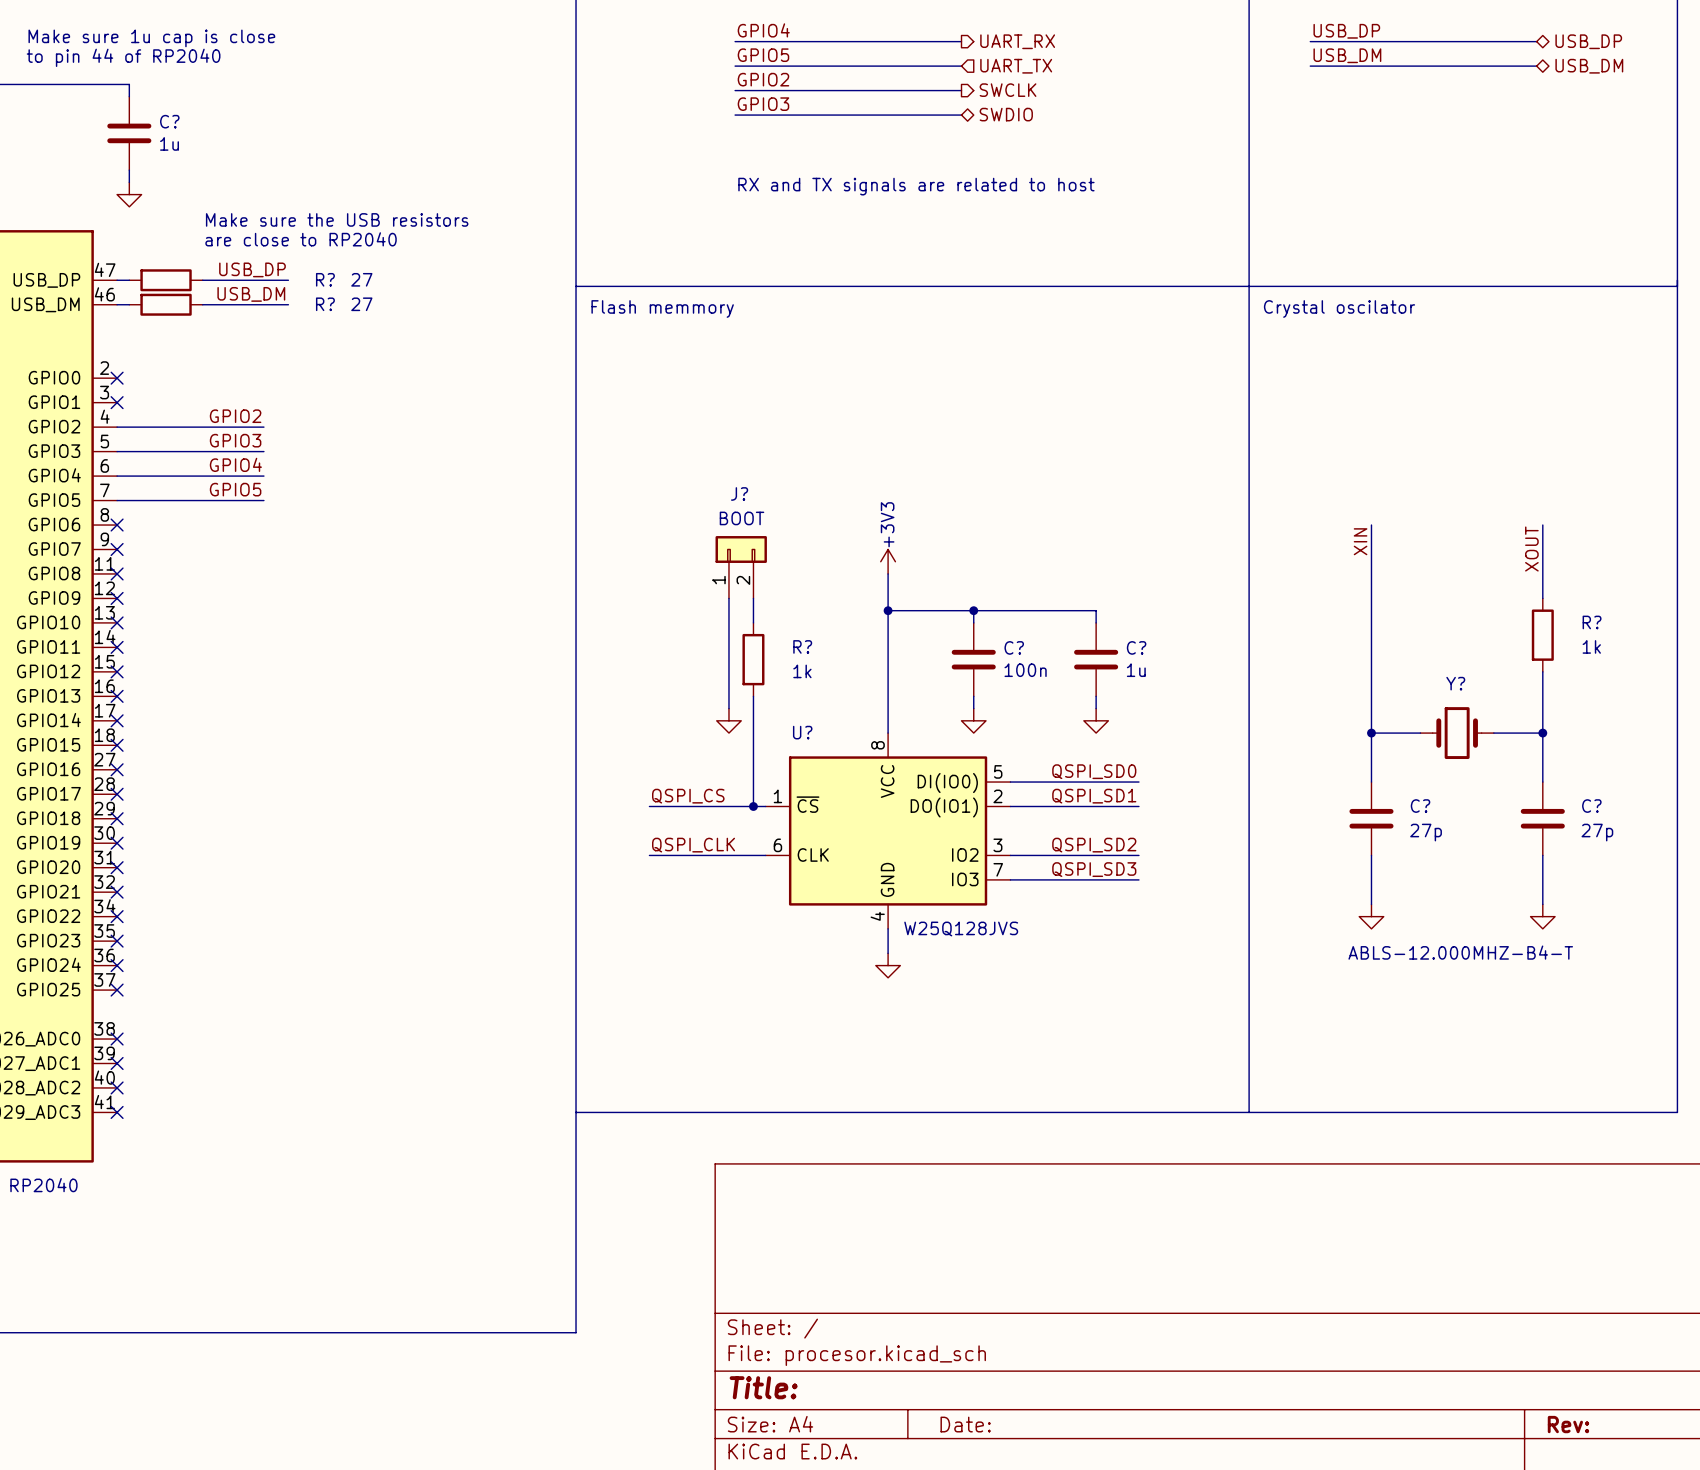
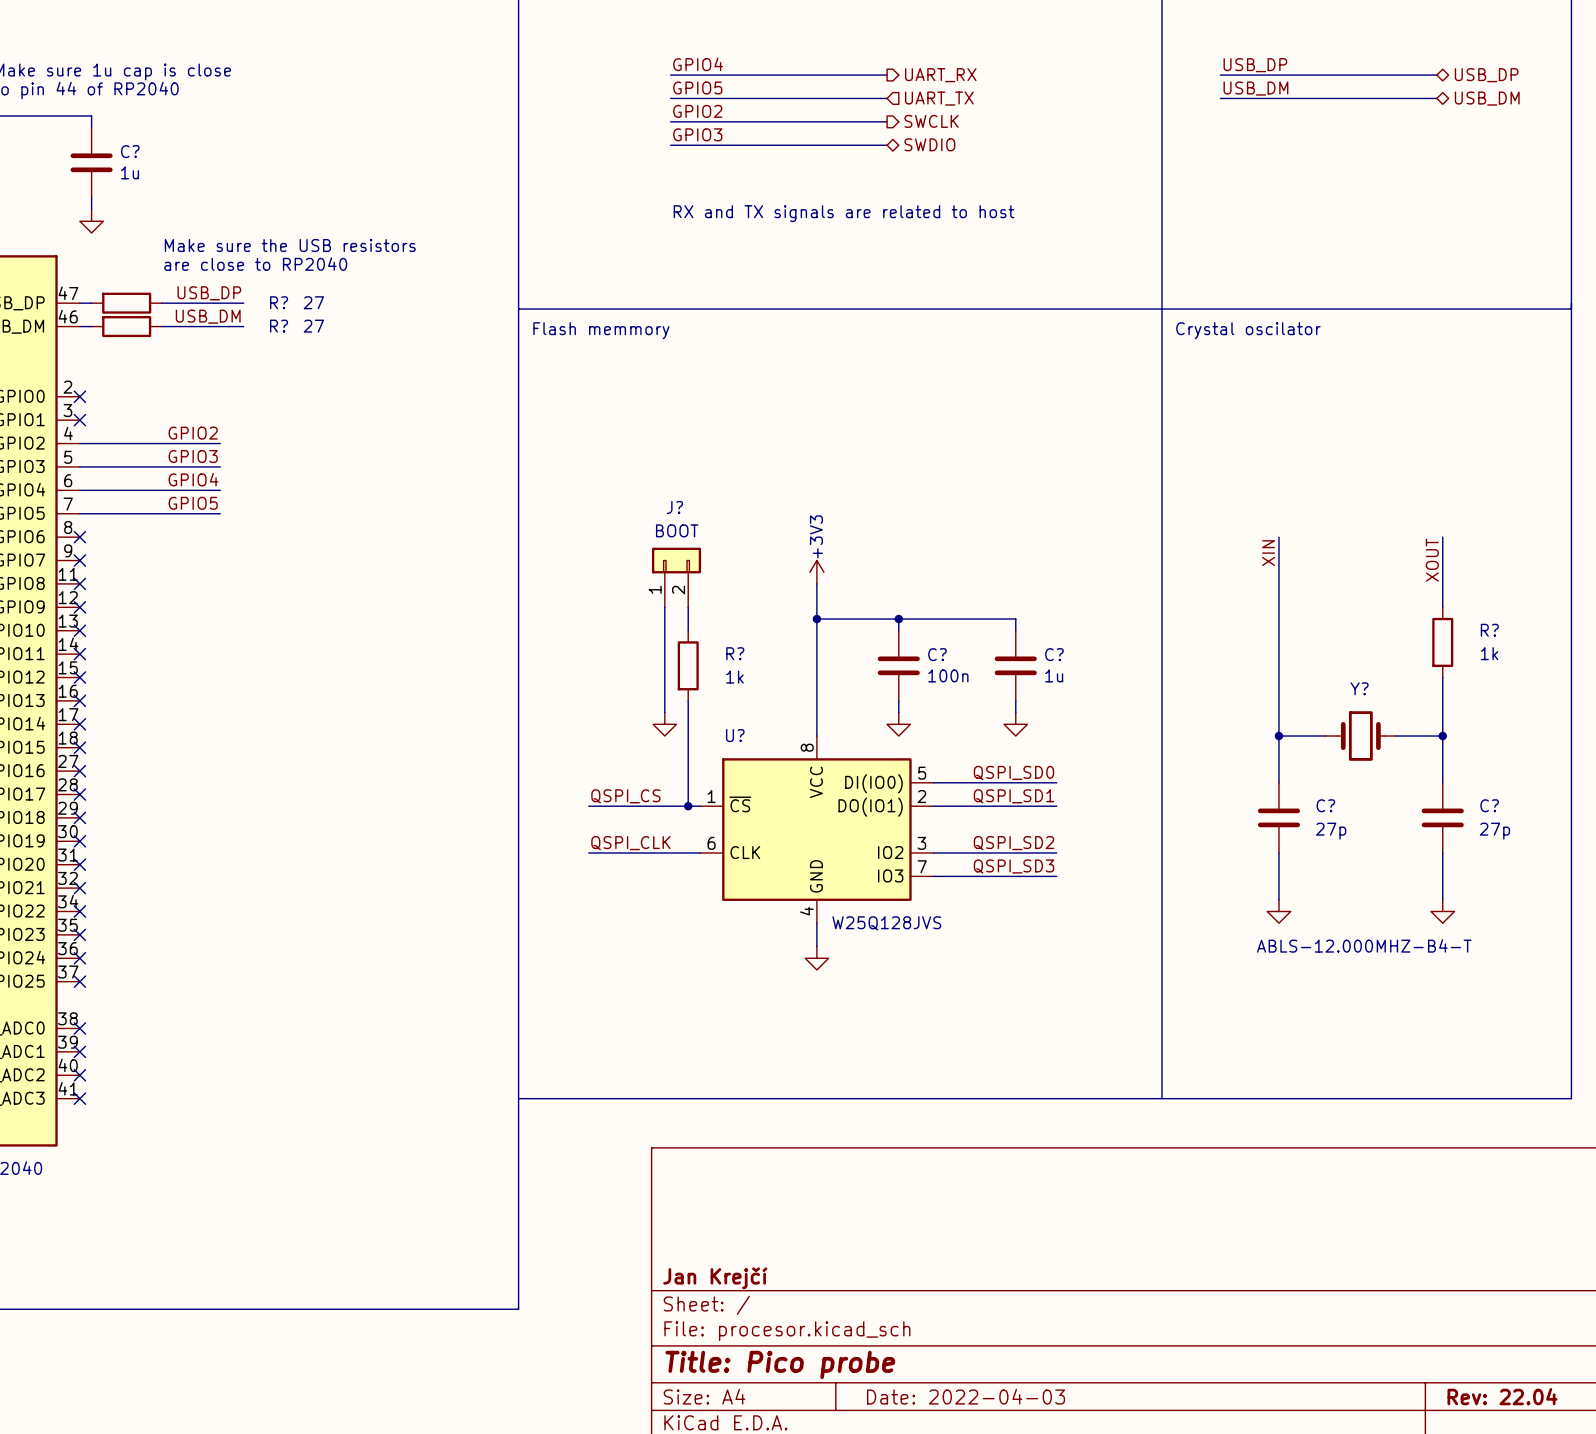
title block: none -> Jan Krejčí (715, 1278)
title block: Title: (763, 1387) -> Title: Pico probe (780, 1364)
title block: Date: (965, 1424) -> Date: 2022-04-03 (966, 1396)
title block: Rev: (1568, 1424) -> Rev: 22.04 (1502, 1396)

